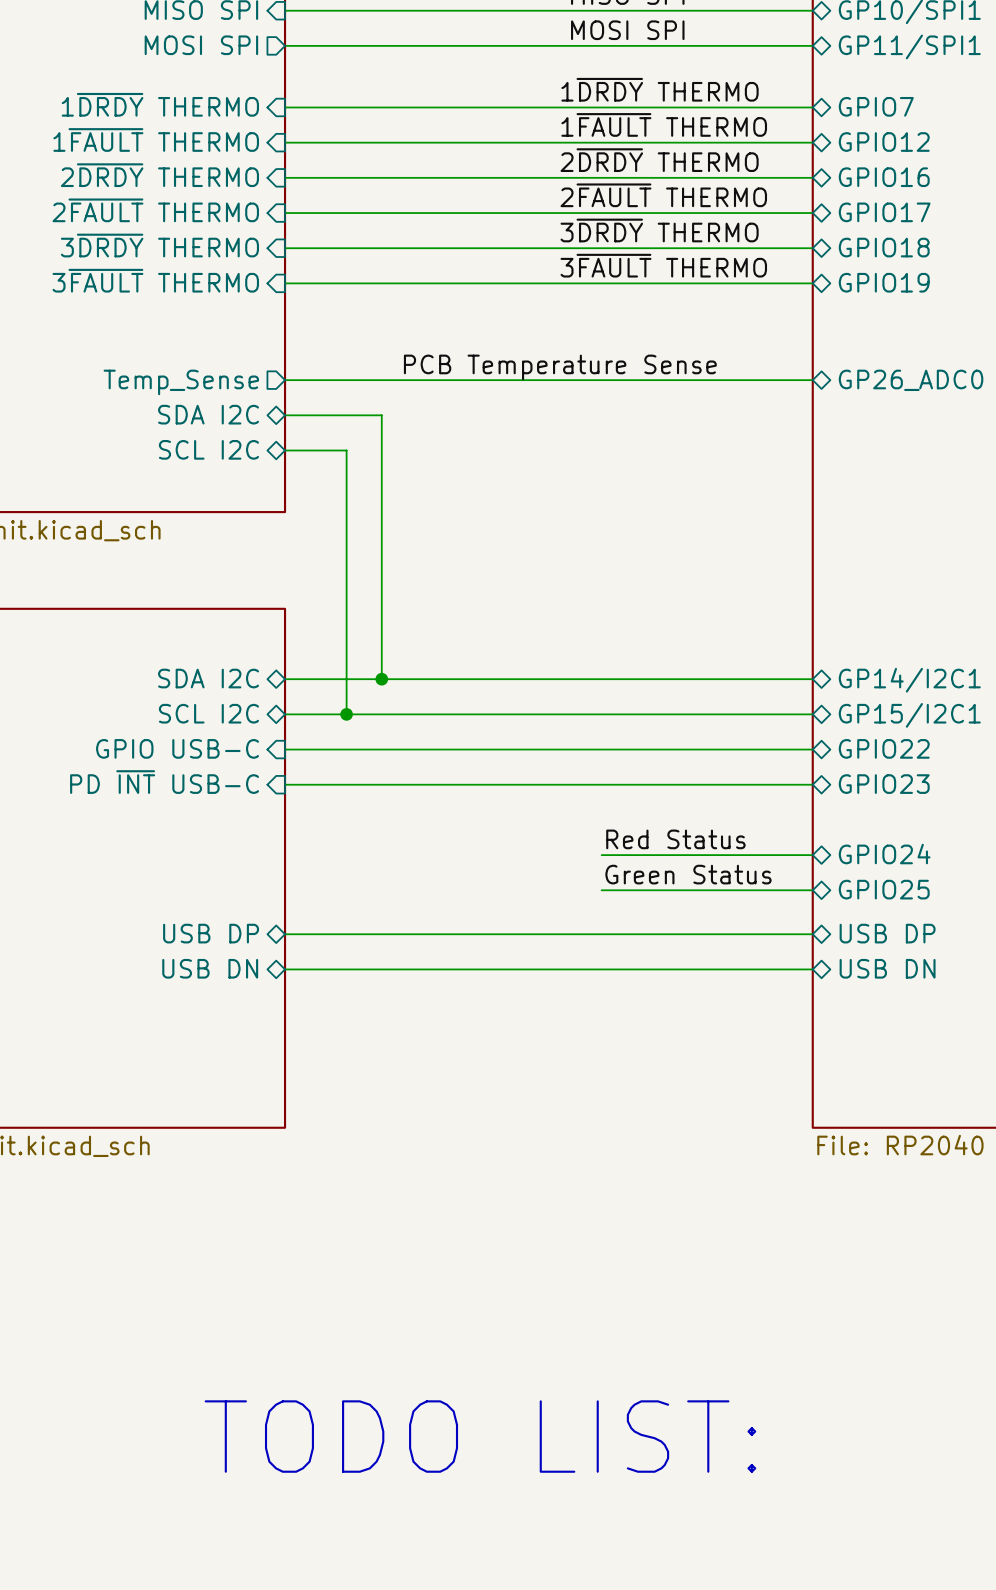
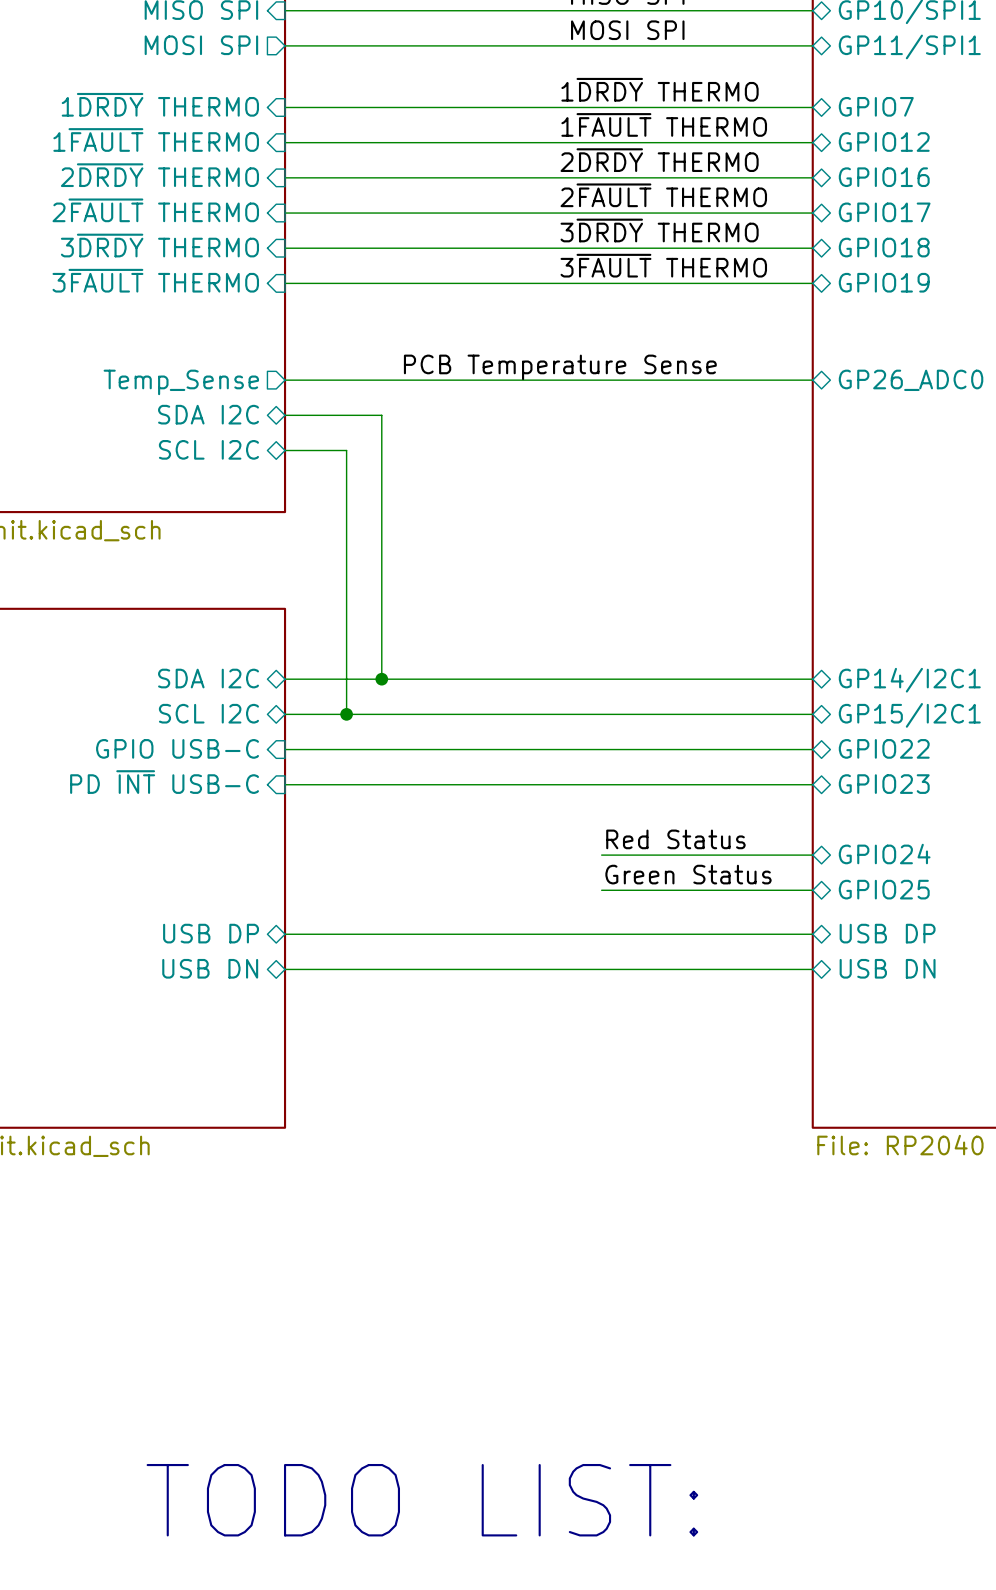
text position: TODO LIST: (480, 1436) -> TODO LIST: (422, 1500)

